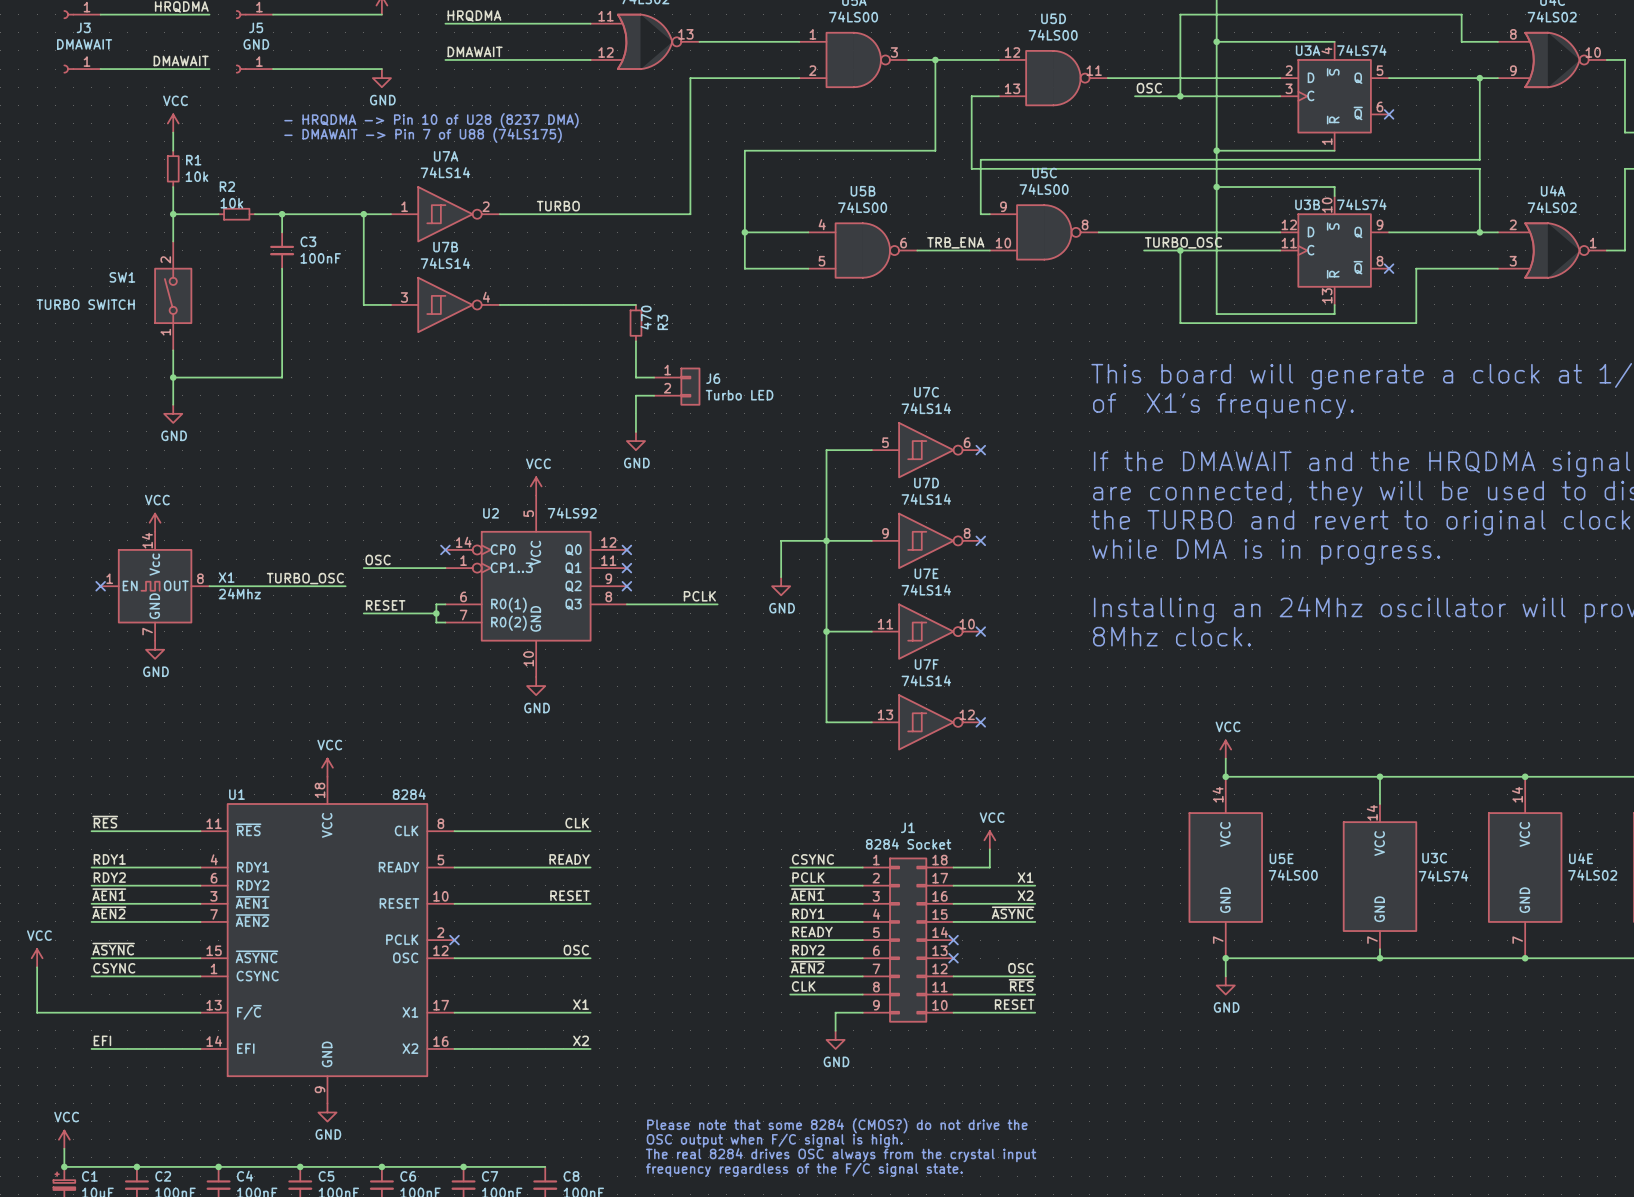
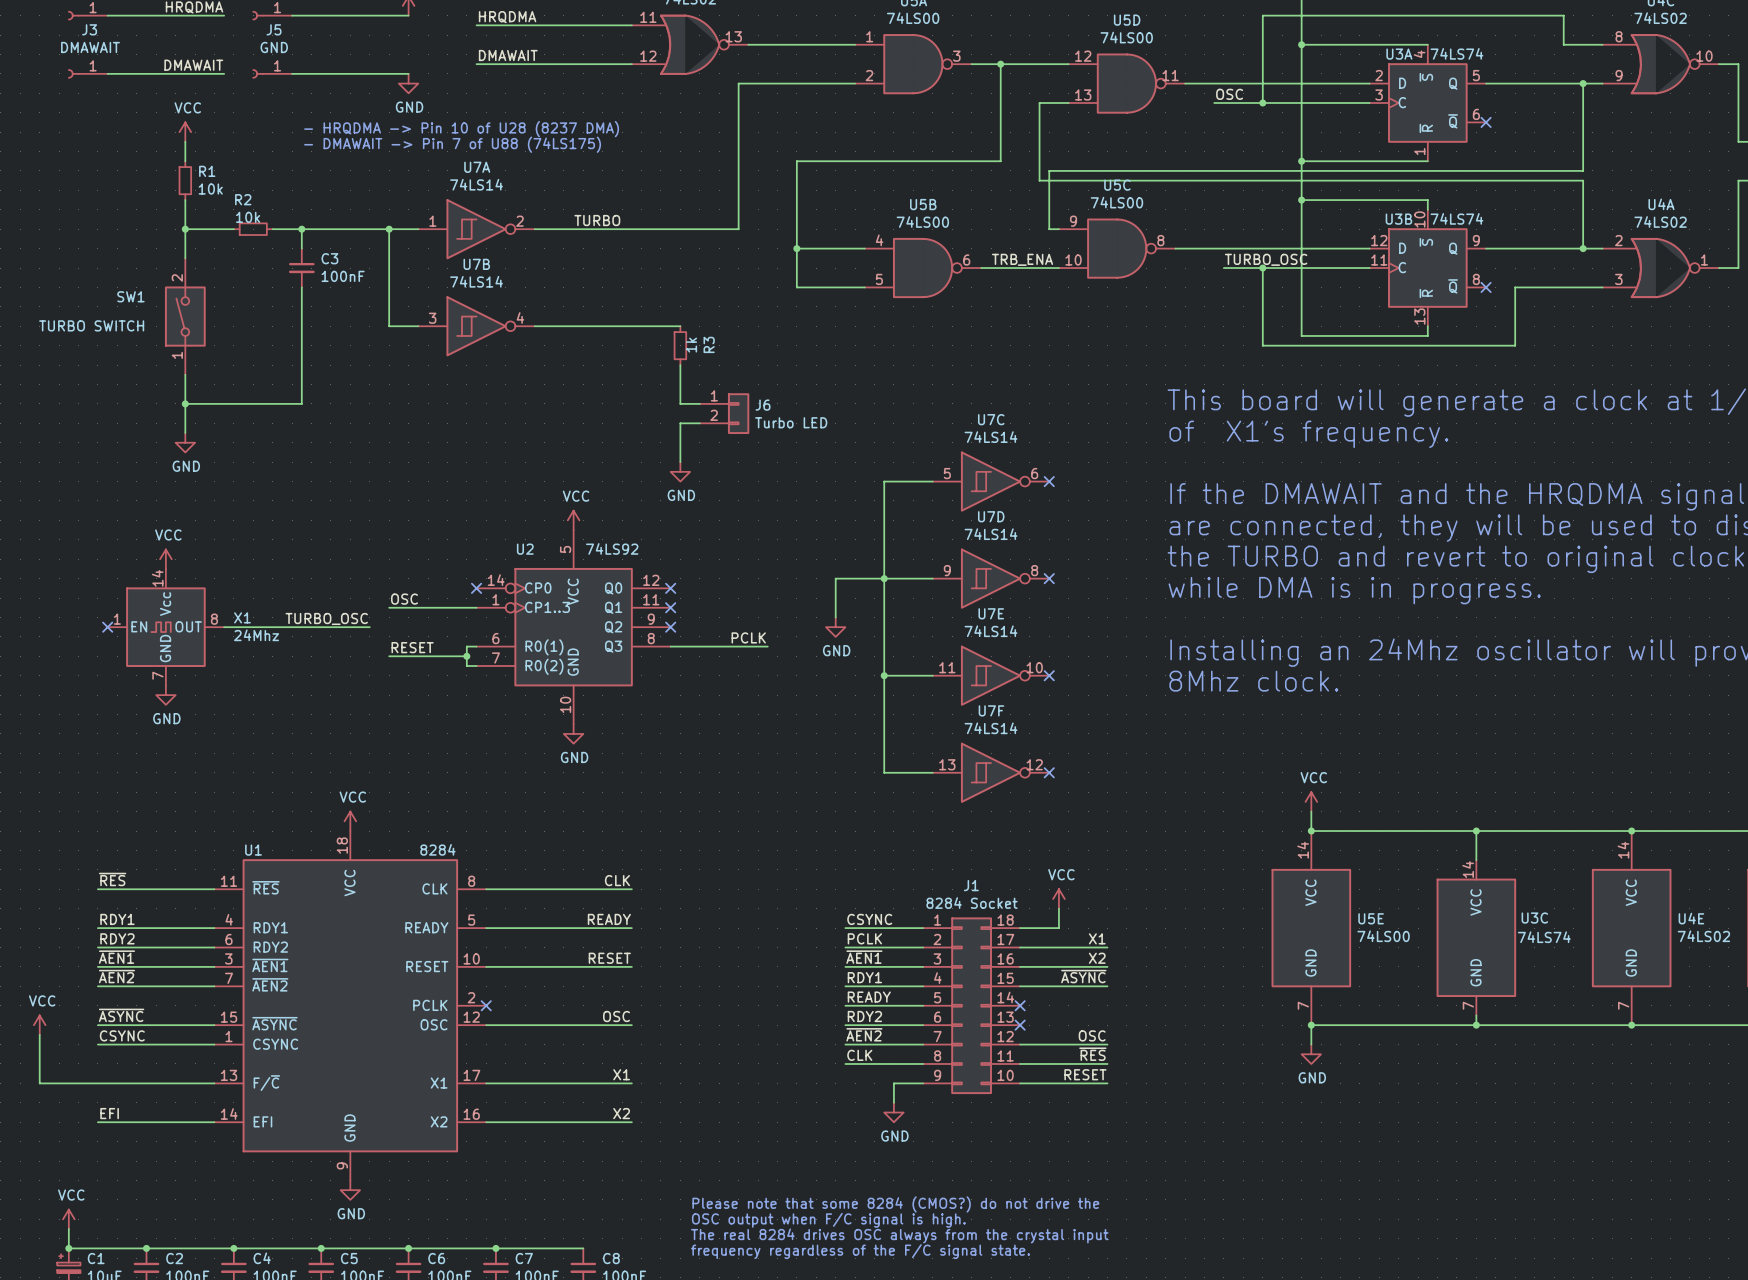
R3 value: 470 (646, 317) -> 1k (691, 345)

